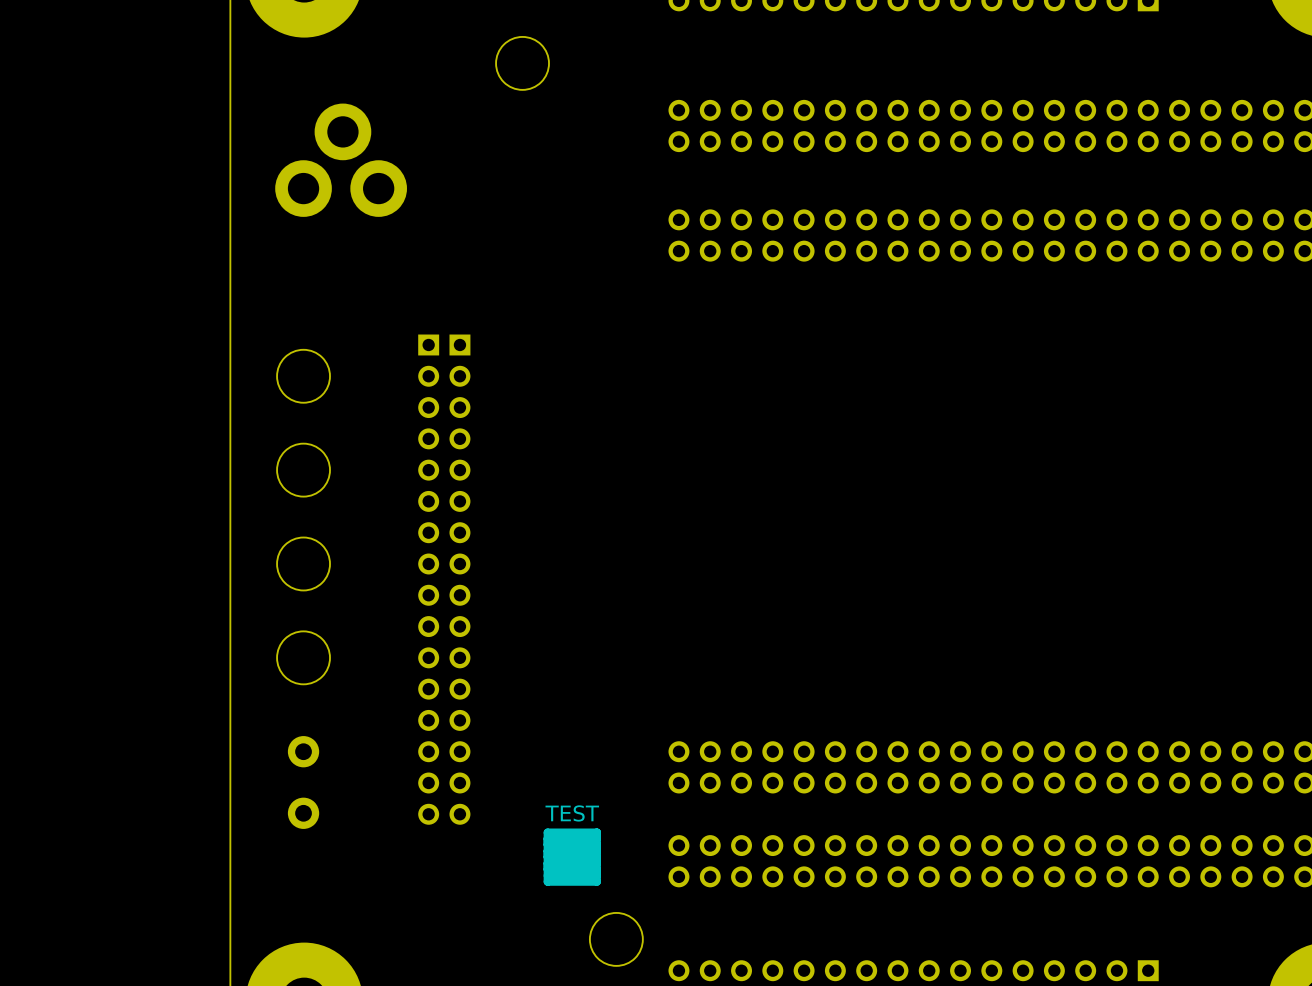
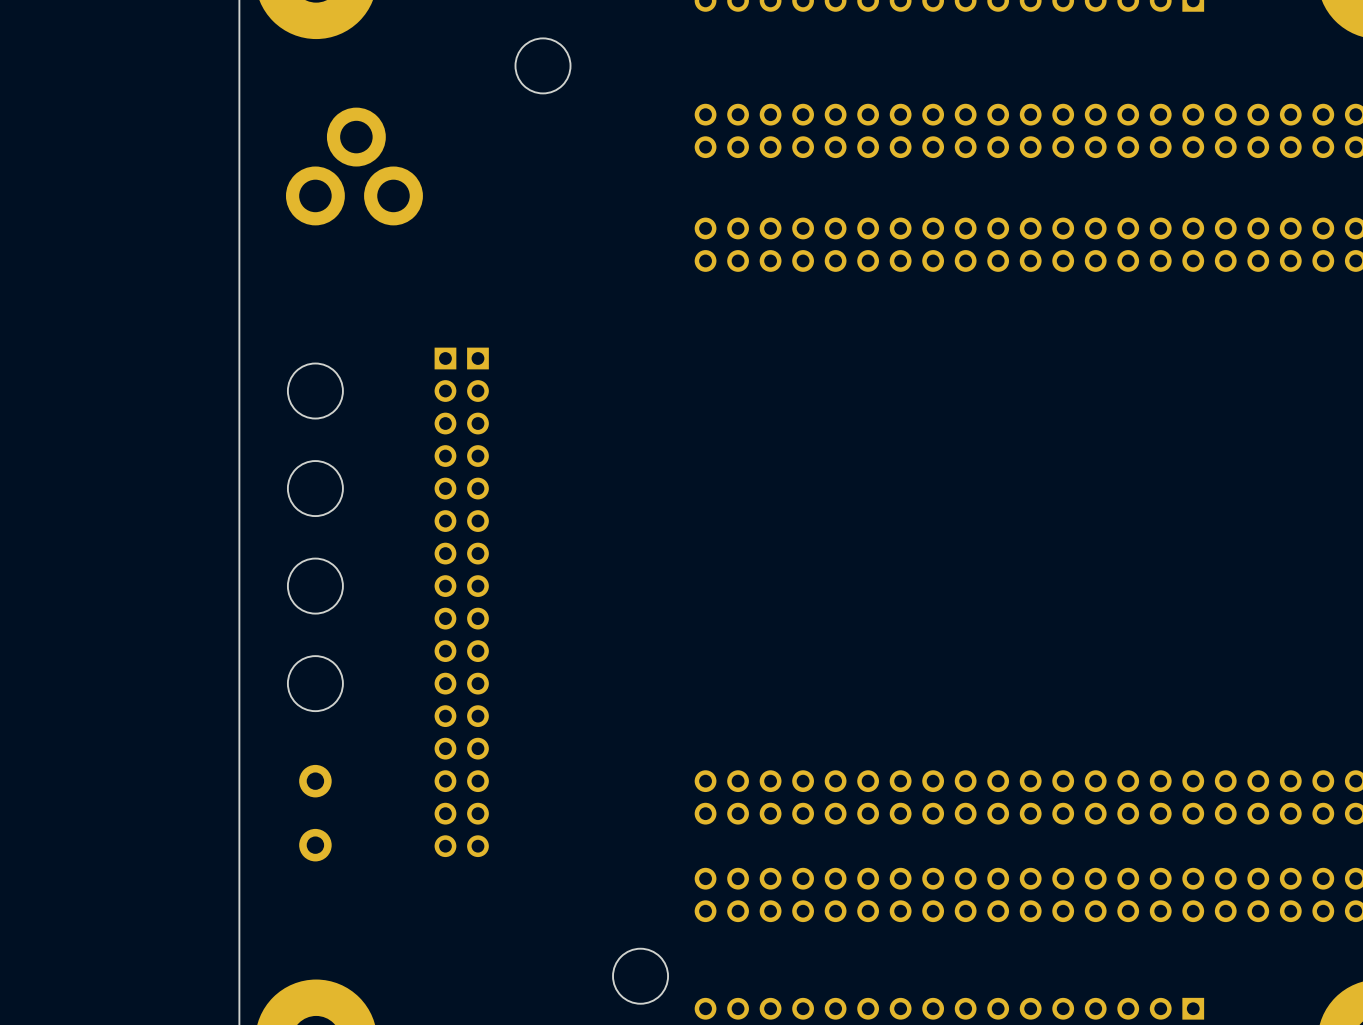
TEST: (572, 857) -> none

